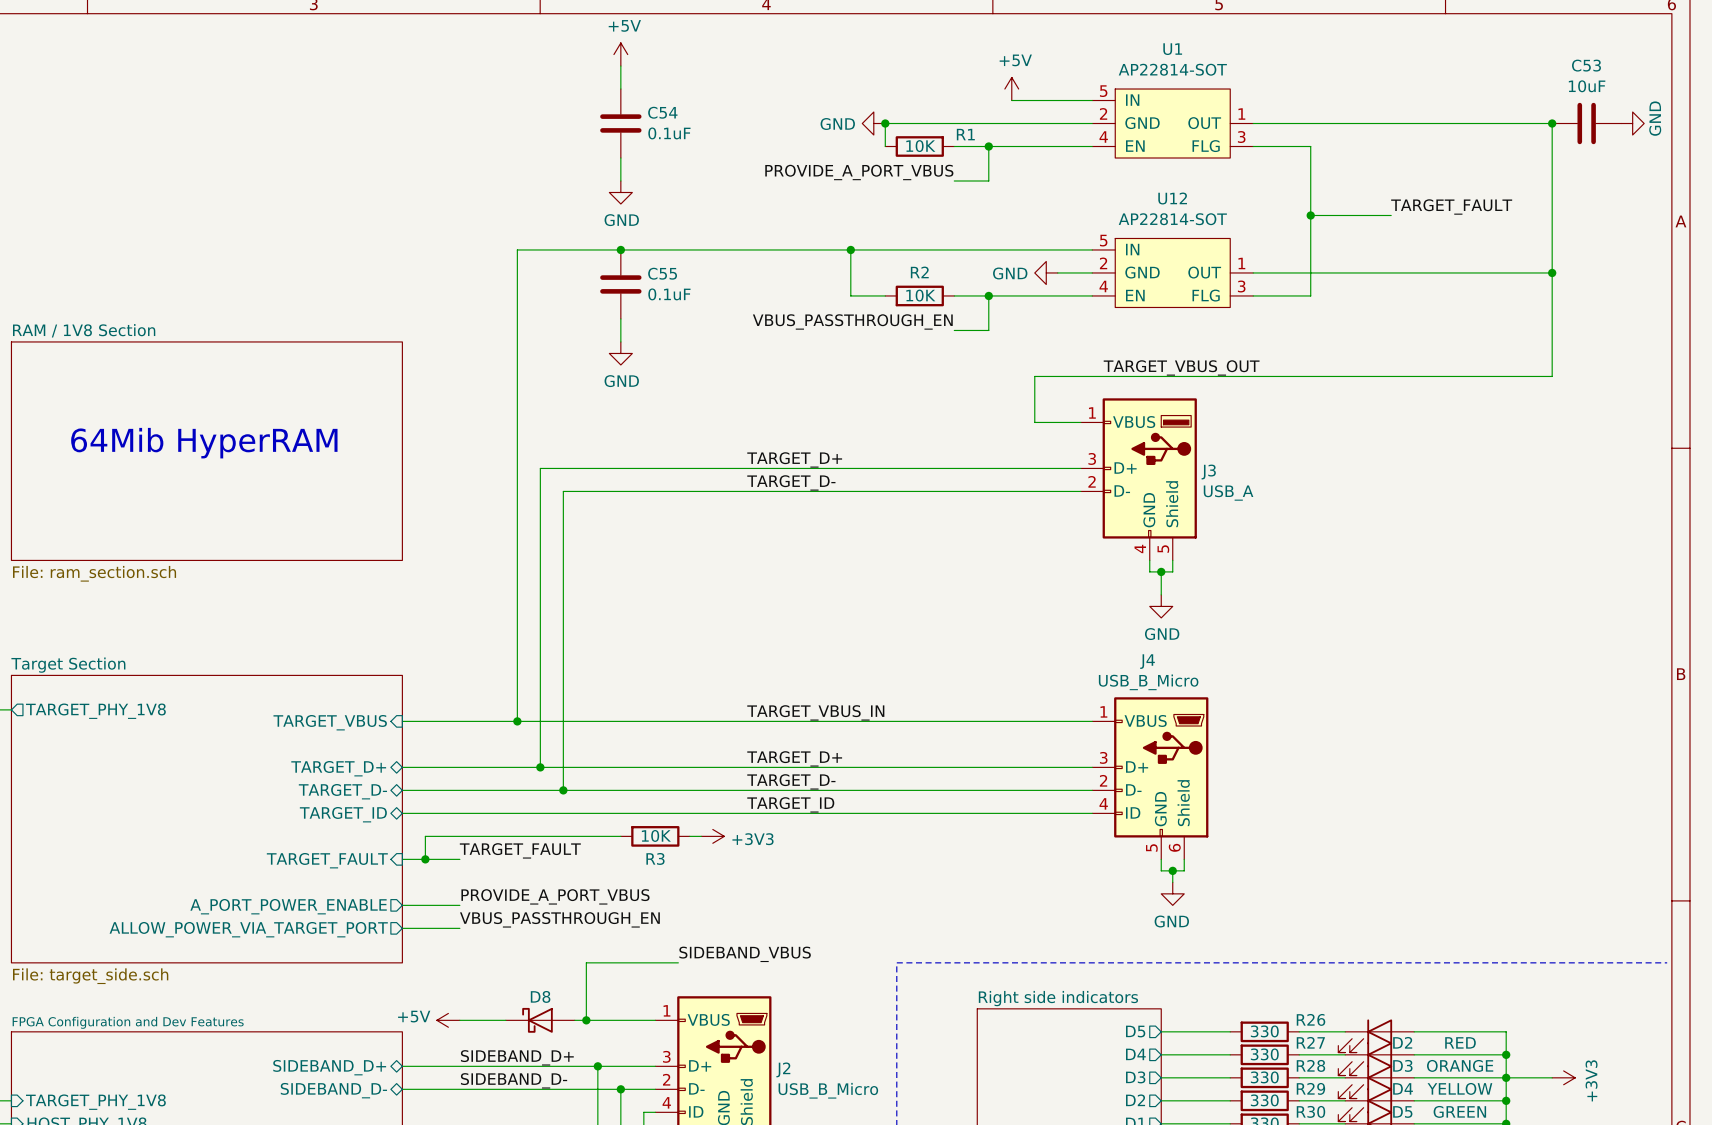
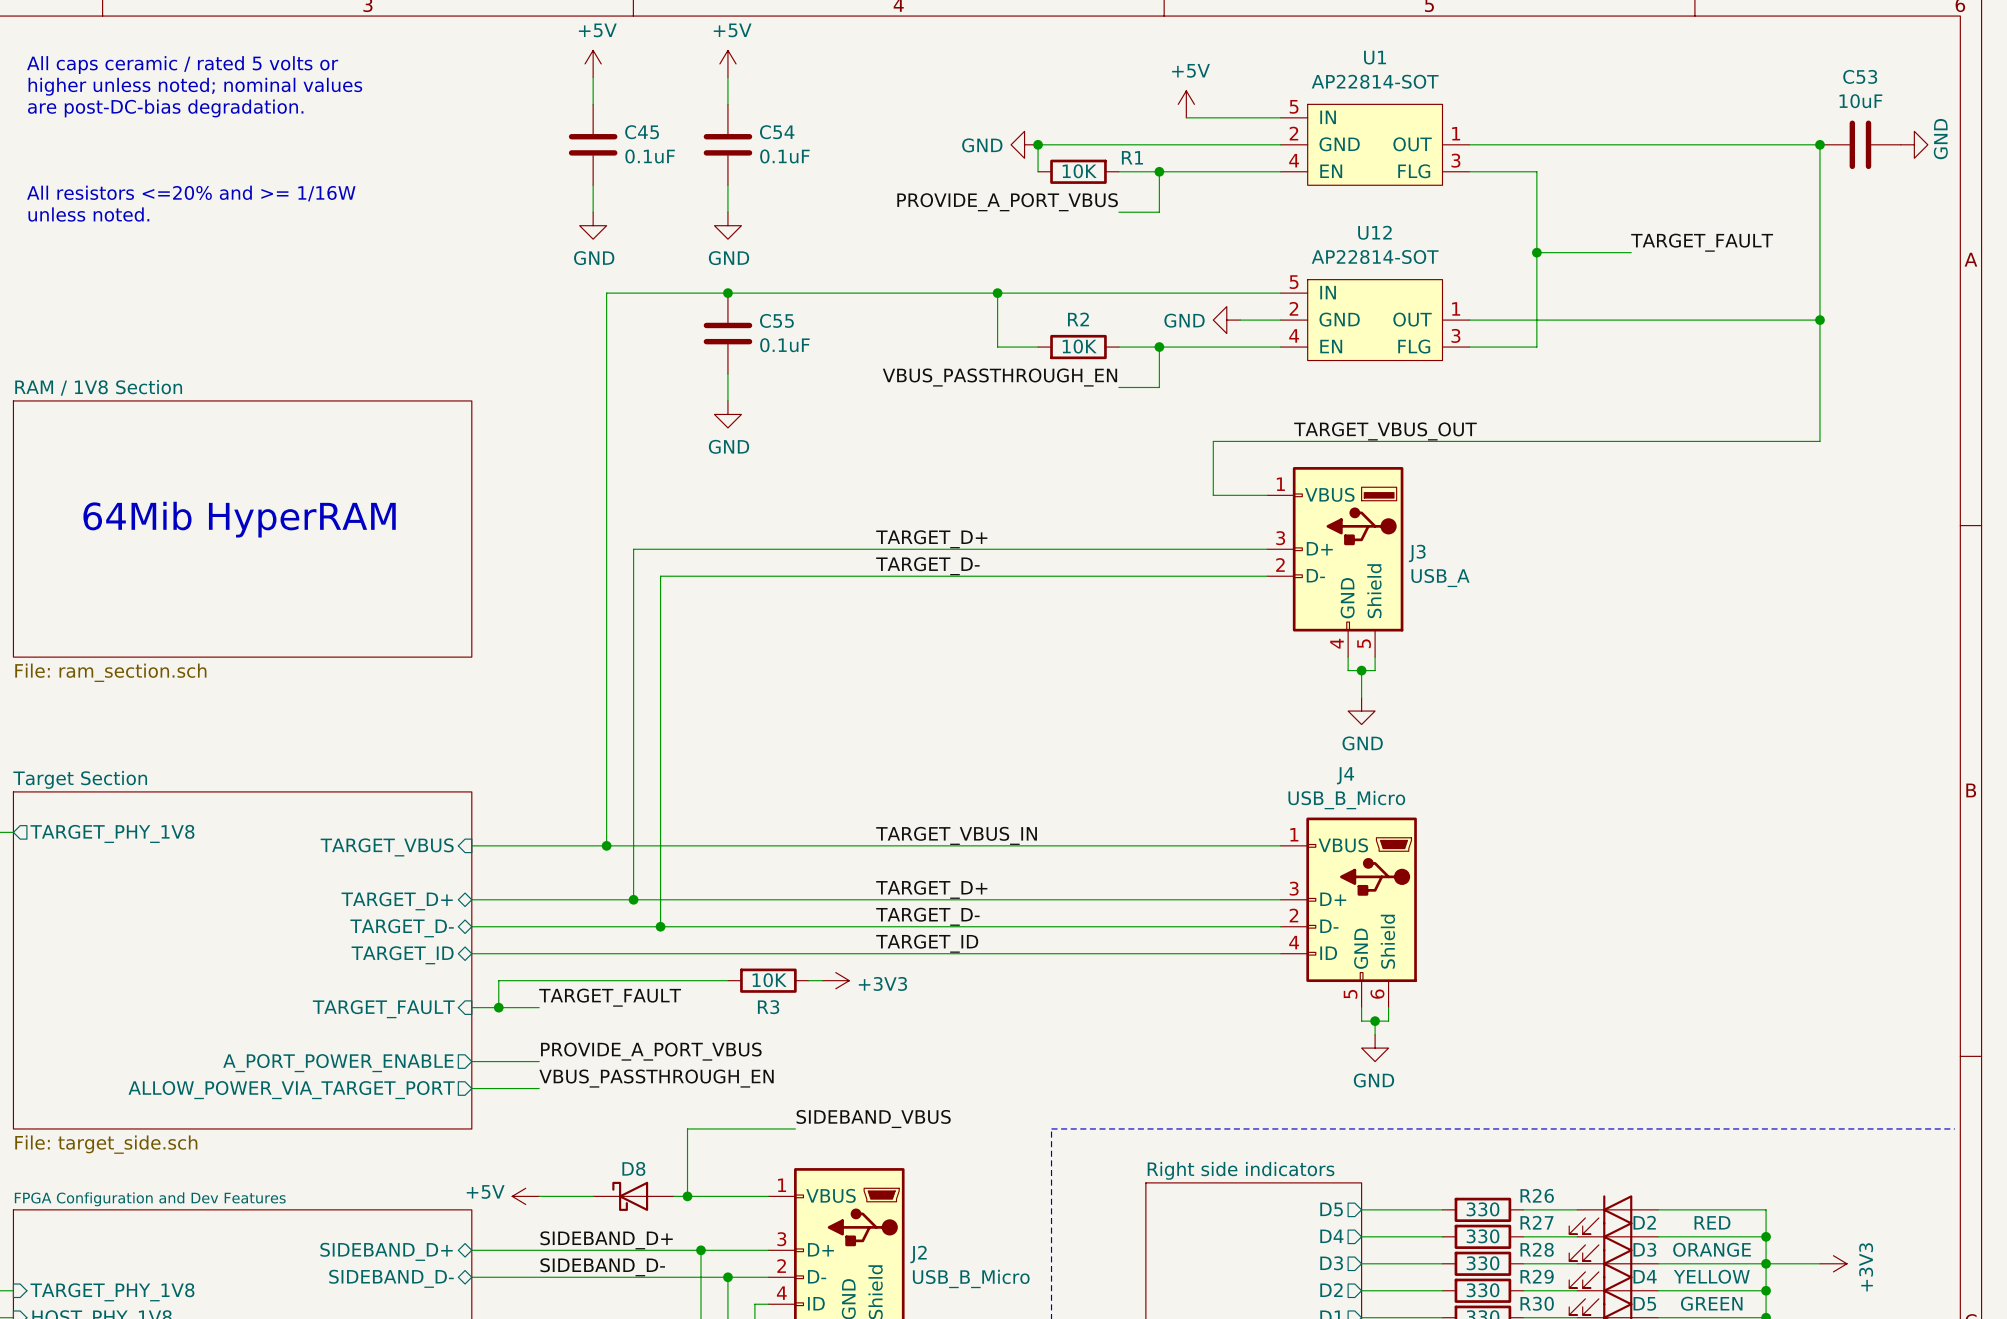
power symbol: none -> +5V (593, 63)
text: none -> All caps ceramic / rated 5 volts or (182, 65)
wire: none -> (593, 77) (593, 104)
text: none -> higher unless noted; nominal values (195, 86)
text: none -> are post-DC-bias degradation. (165, 108)
C45: none -> 0.1uF (593, 144)
wire: none -> (593, 185) (593, 212)
text: none -> All resistors <=20% and >= 1/16W (191, 193)
text: none -> unless noted. (88, 214)
power symbol: none -> GND (593, 225)

